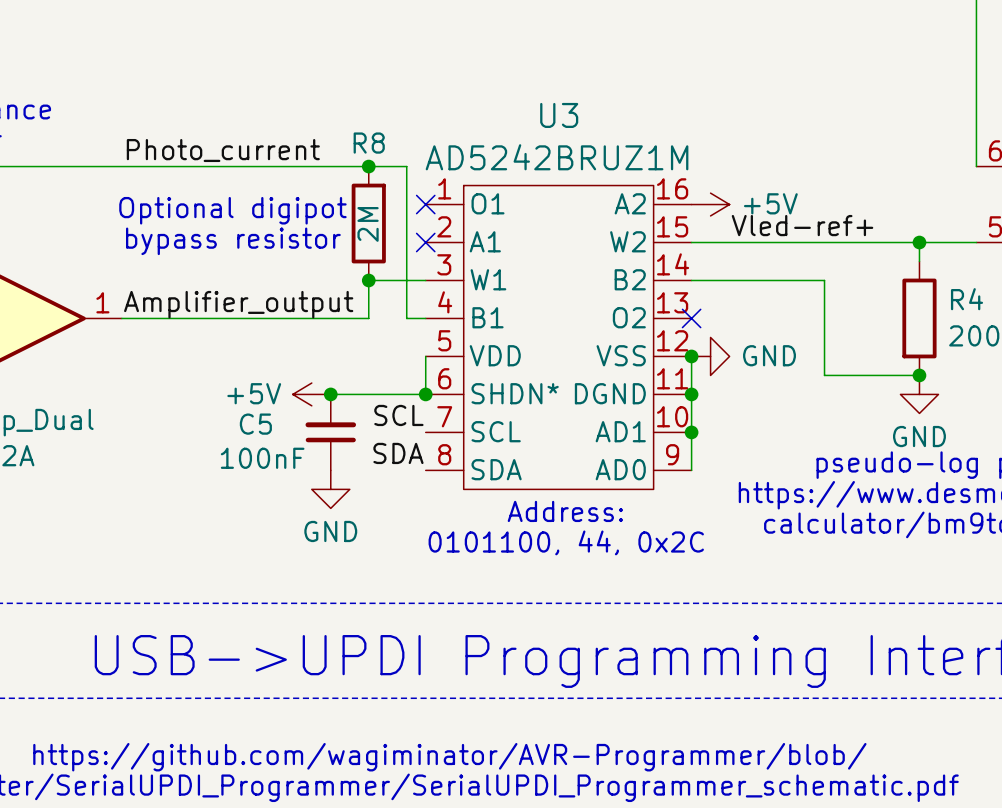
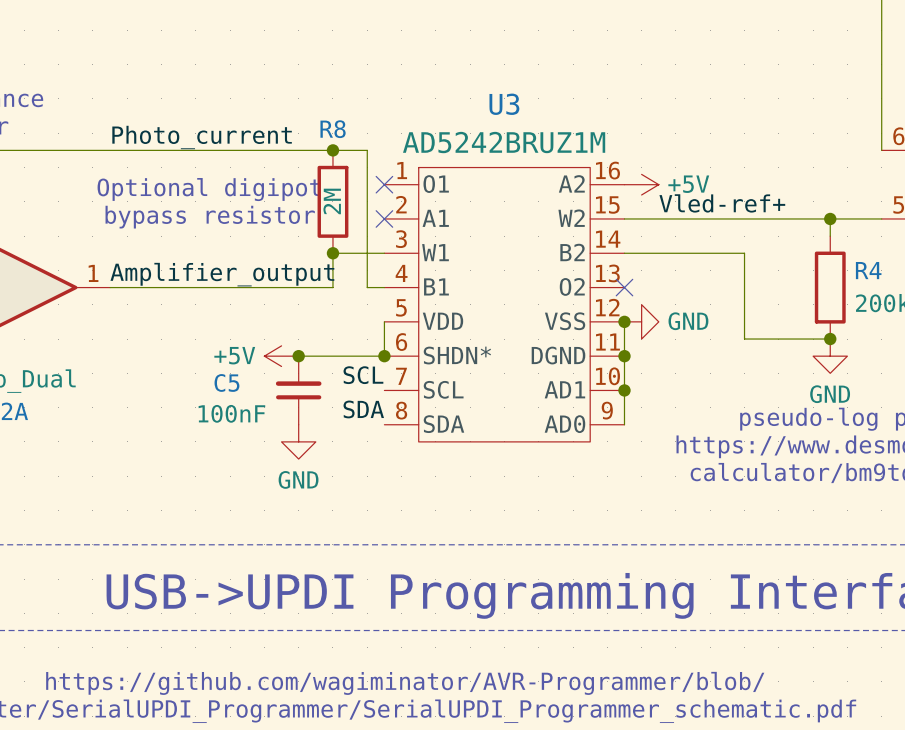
text: Address: (565, 511) -> none
text: 0101100, 44, 0x2C (566, 542) -> none

